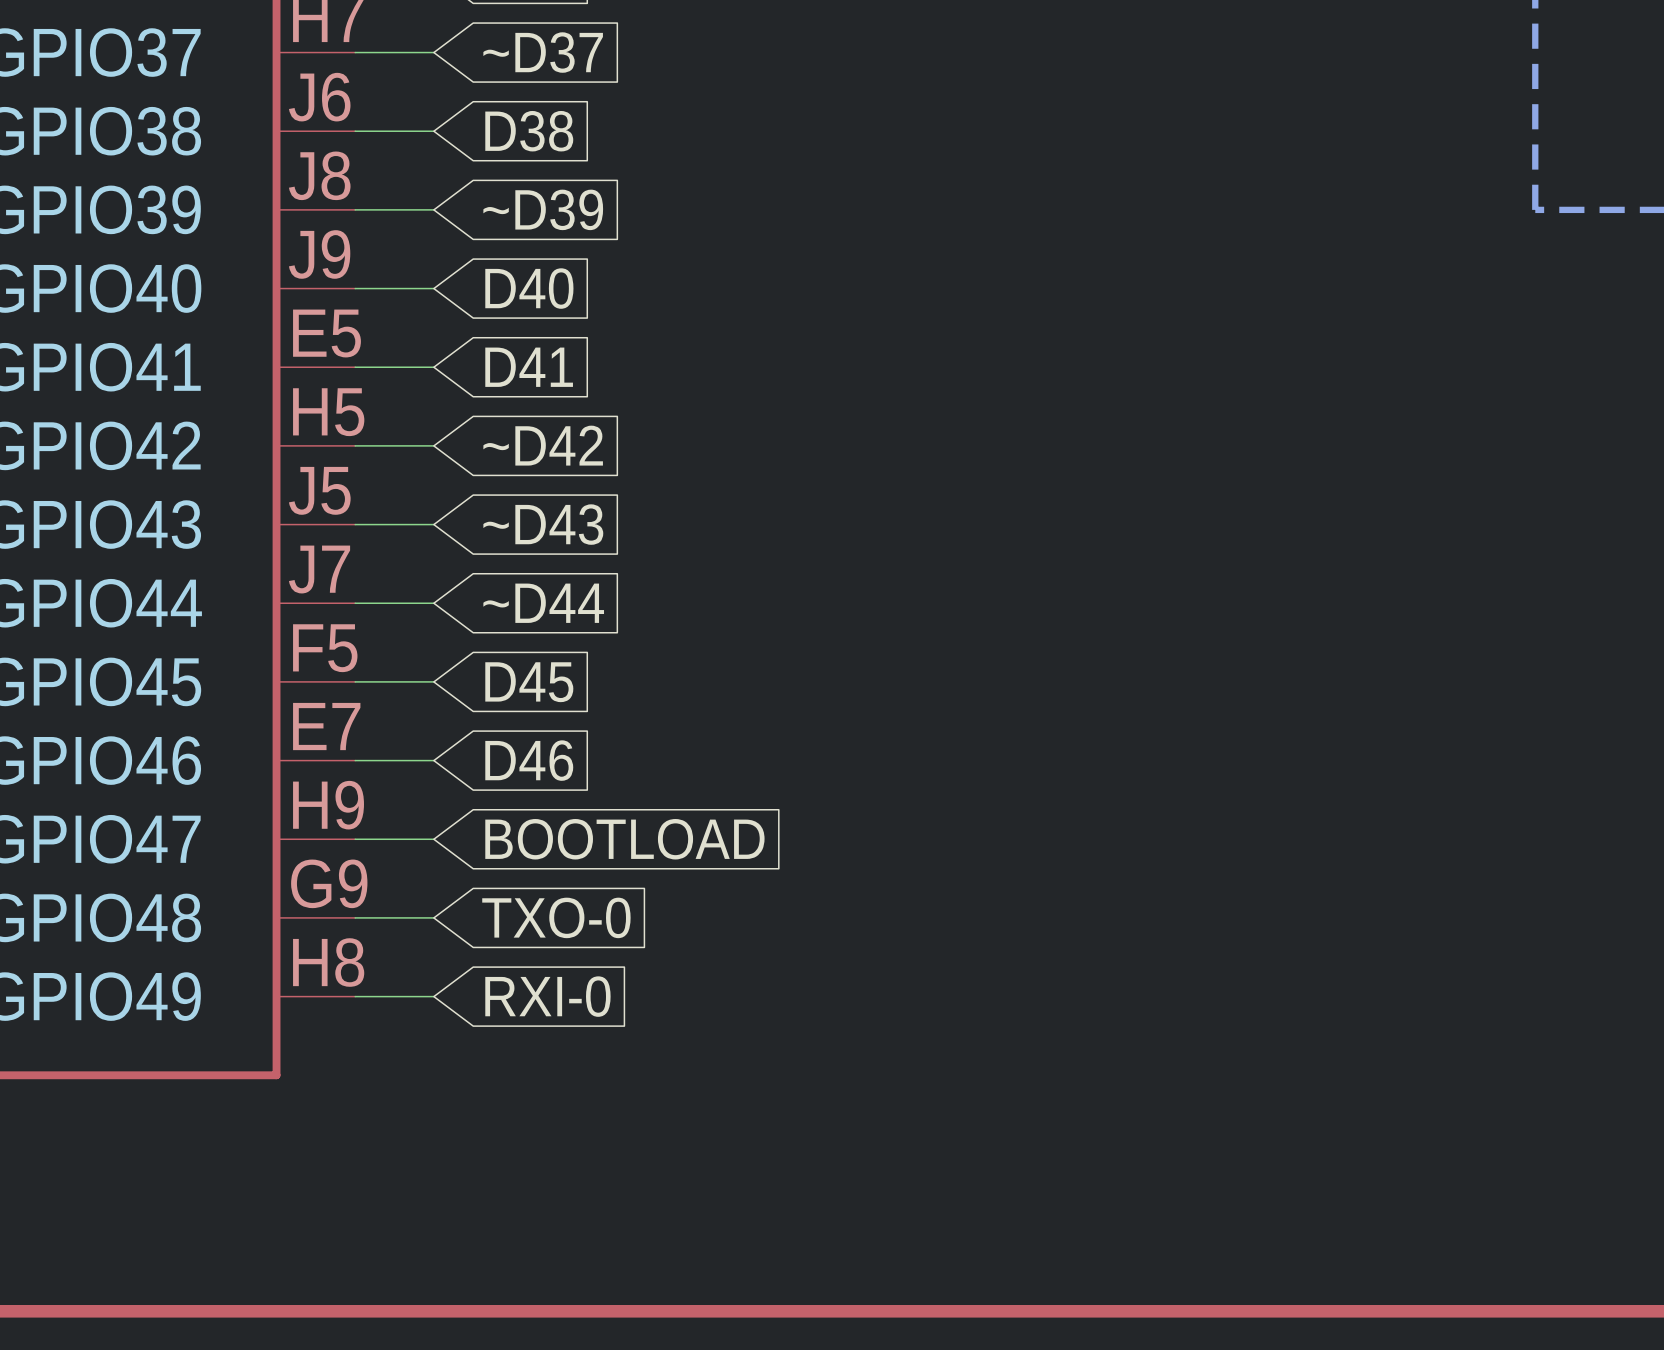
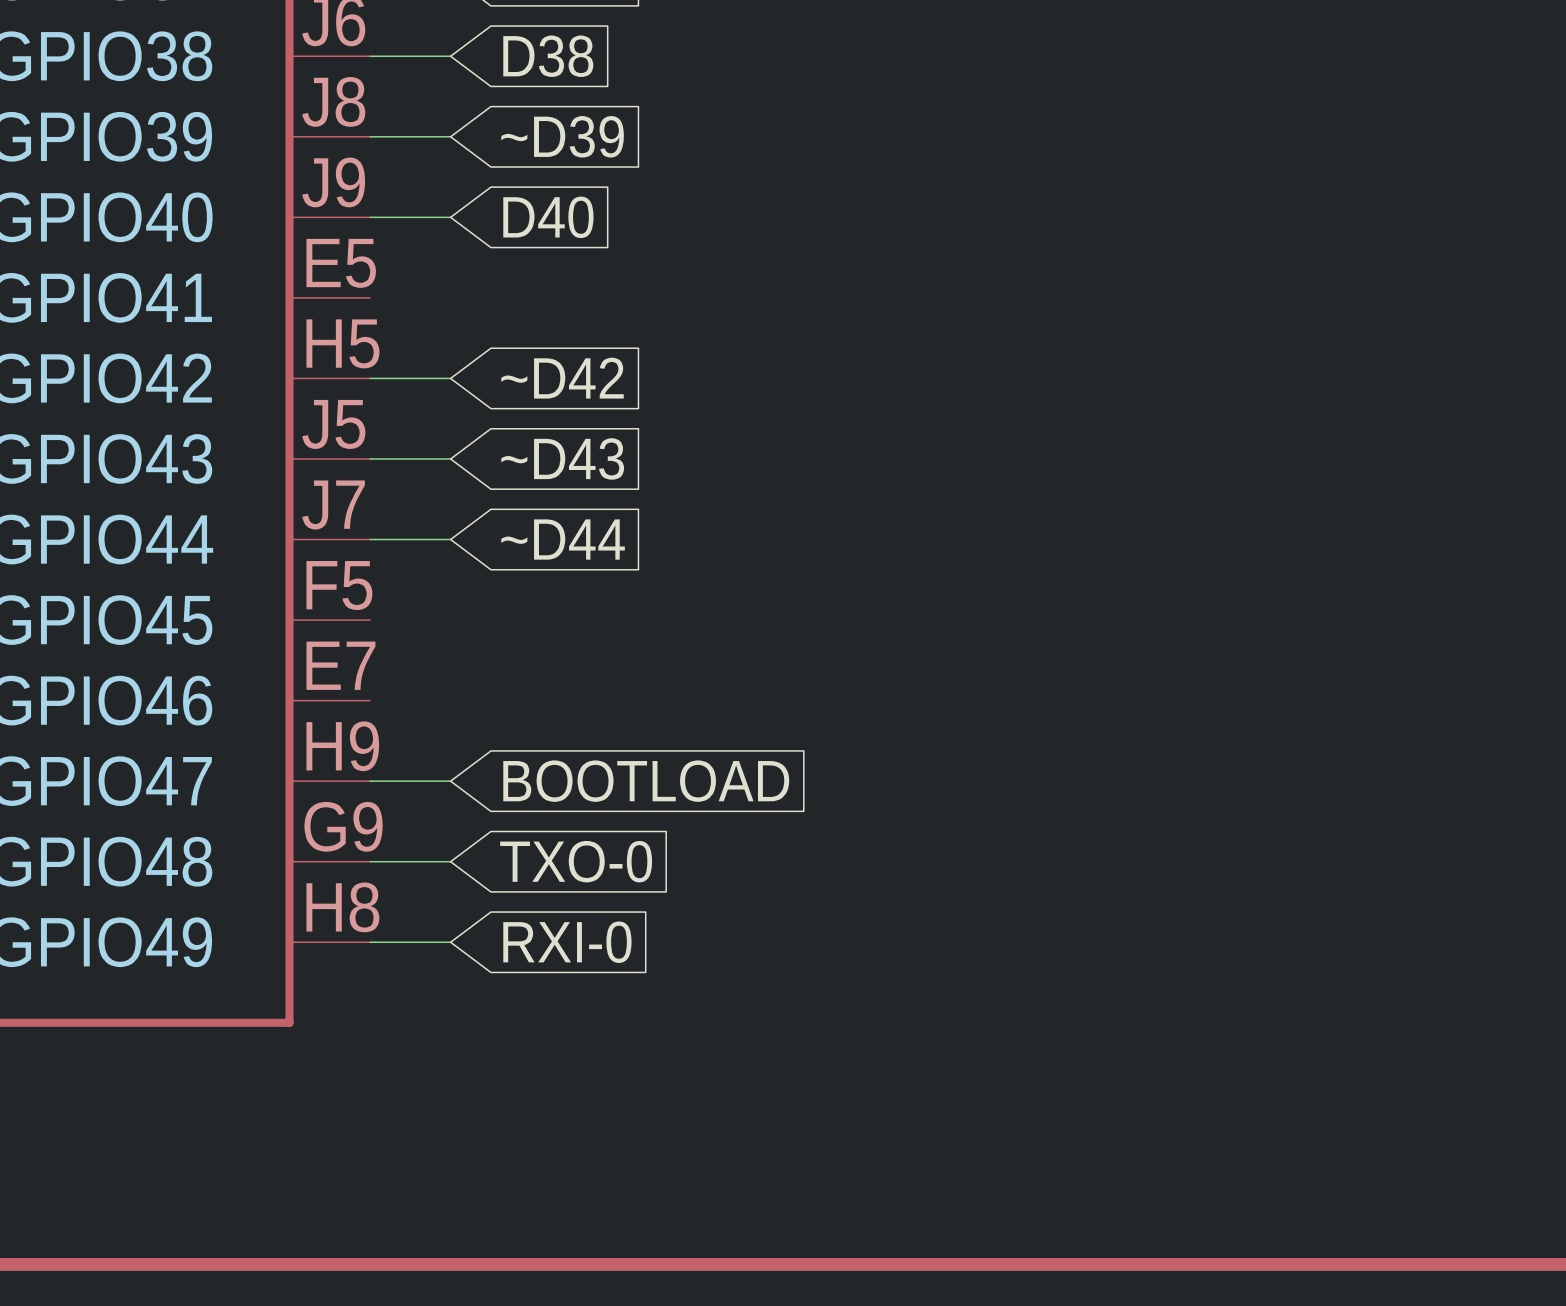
wire: (355, 367) (433, 367) -> none
global label: D41 (529, 367) -> none
wire: (355, 681) (433, 681) -> none
global label: D45 (529, 682) -> none
wire: (355, 760) (433, 760) -> none
global label: D46 (529, 760) -> none

